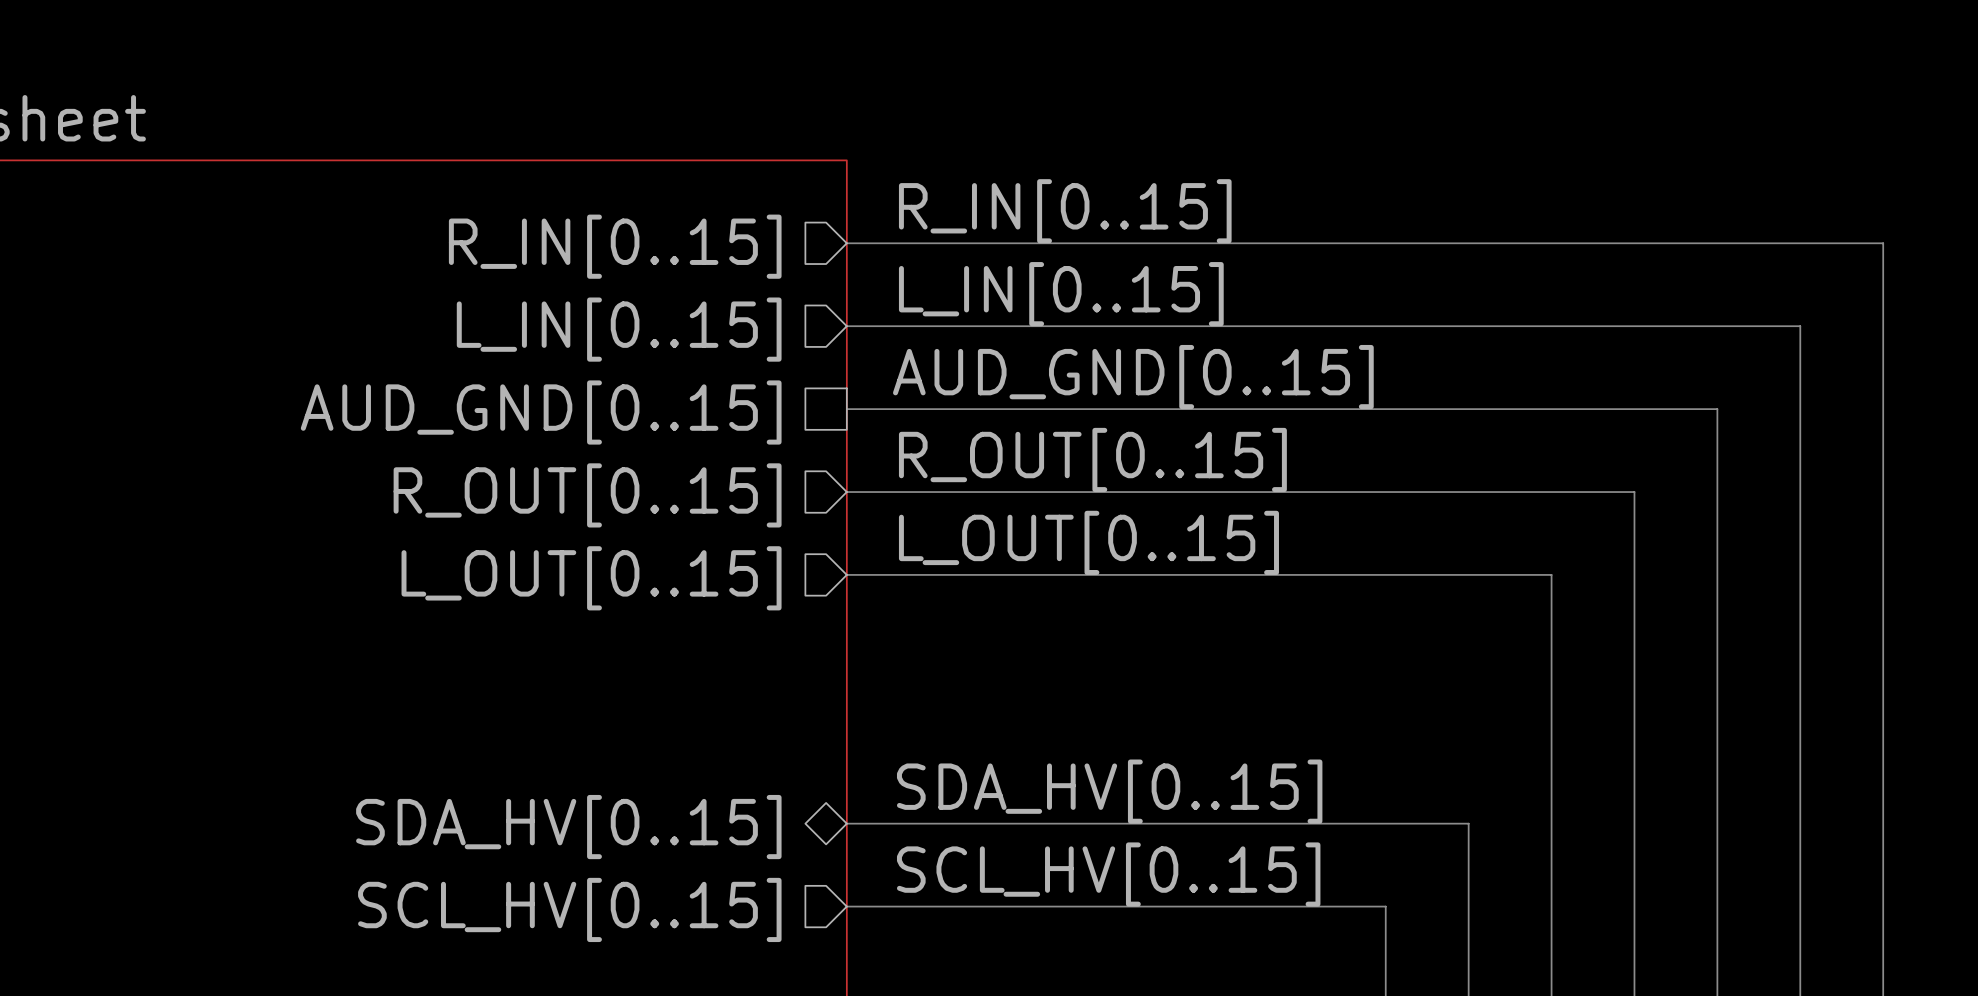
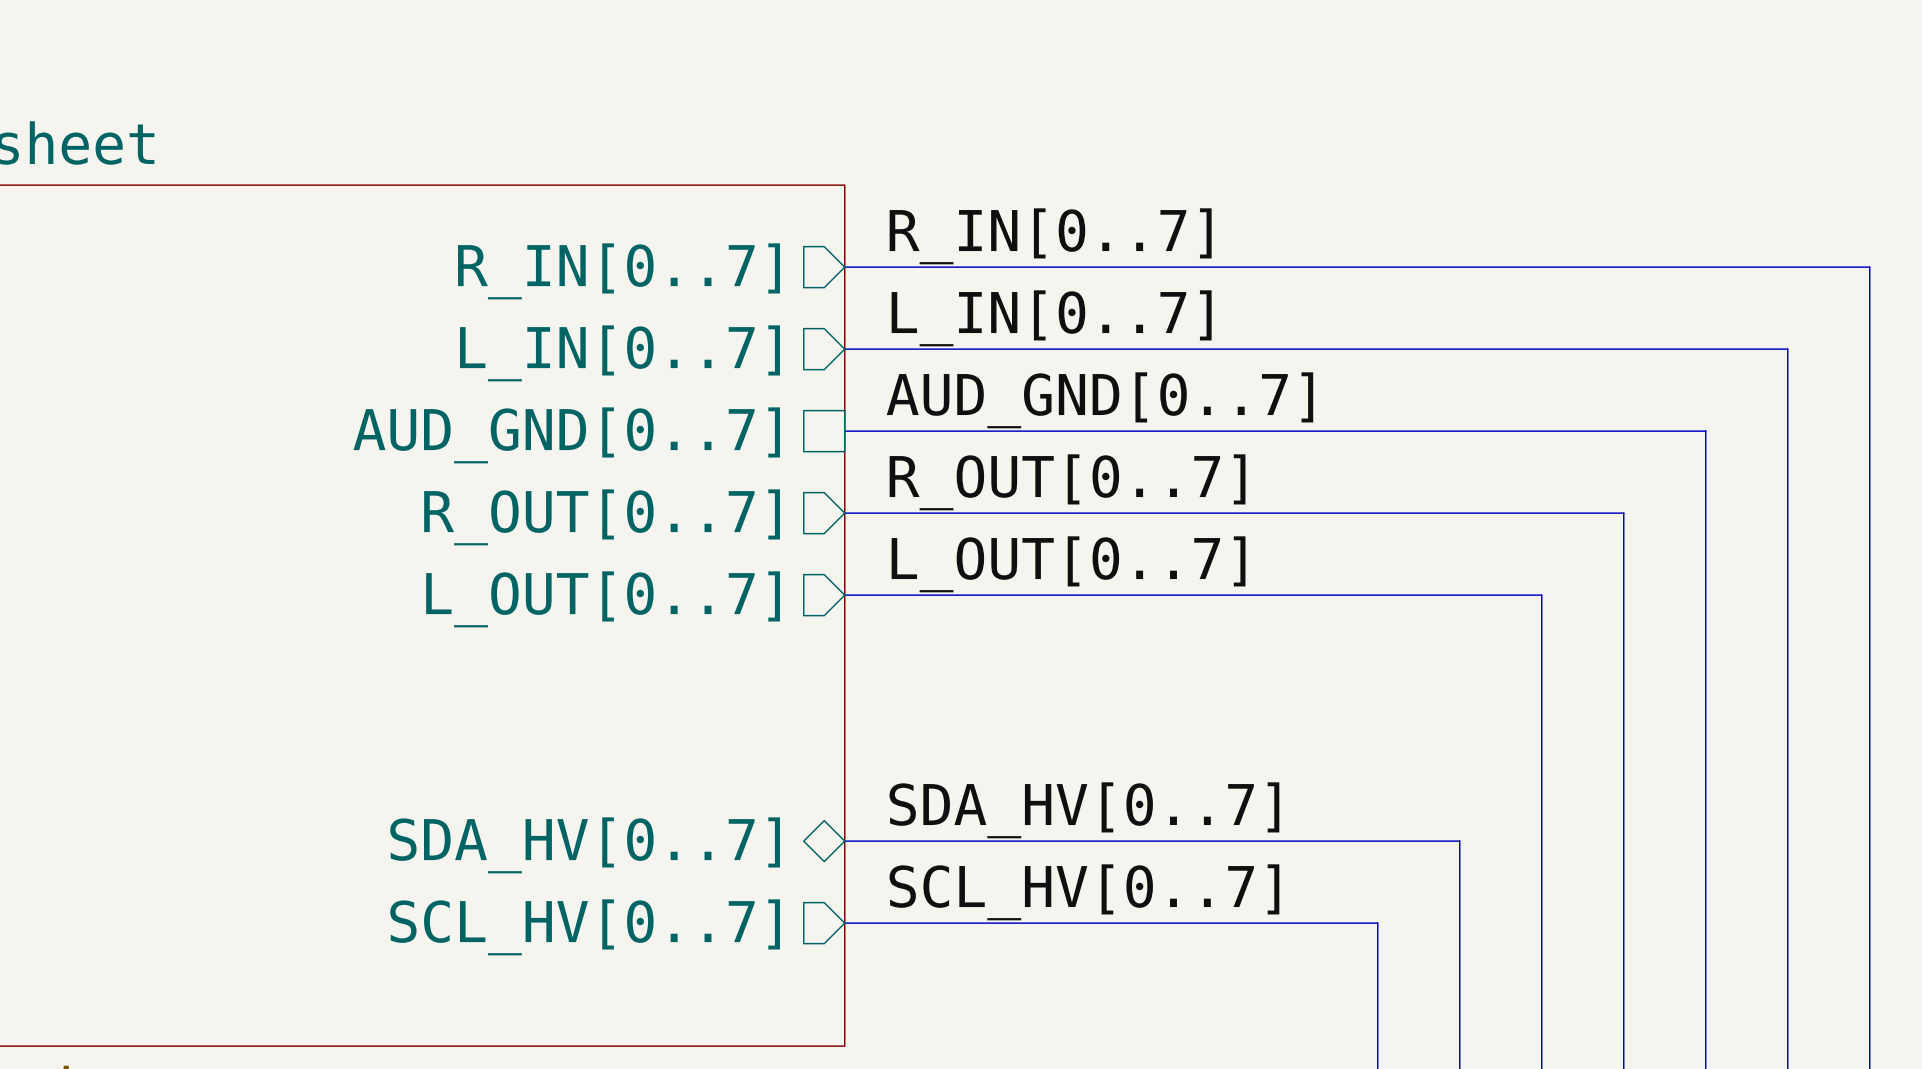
label: R_IN[0..15] (1065, 211) -> R_IN[0..7] (1050, 236)
sheet pin: R_IN[0..15] (615, 246) -> R_IN[0..7] (618, 271)
label: L_IN[0..15] (1061, 294) -> L_IN[0..7] (1051, 318)
sheet pin: L_IN[0..15] (619, 329) -> L_IN[0..7] (619, 353)
label: AUD_GND[0..15] (1133, 377) -> AUD_GND[0..7] (1099, 400)
sheet pin: AUD_GND[0..15] (541, 412) -> AUD_GND[0..7] (566, 435)
label: R_OUT[0..15] (1092, 459) -> R_OUT[0..7] (1067, 482)
sheet pin: R_OUT[0..15] (587, 495) -> R_OUT[0..7] (602, 517)
label: L_OUT[0..15] (1088, 542) -> L_OUT[0..7] (1068, 564)
sheet pin: L_OUT[0..15] (591, 578) -> L_OUT[0..7] (603, 599)
label: SDA_HV[0..15] (1109, 791) -> SDA_HV[0..7] (1084, 810)
sheet pin: SDA_HV[0..15] (568, 827) -> SDA_HV[0..7] (585, 845)
label: SCL_HV[0..15] (1108, 874) -> SCL_HV[0..7] (1084, 892)
sheet pin: SCL_HV[0..15] (569, 909) -> SCL_HV[0..7] (585, 927)

